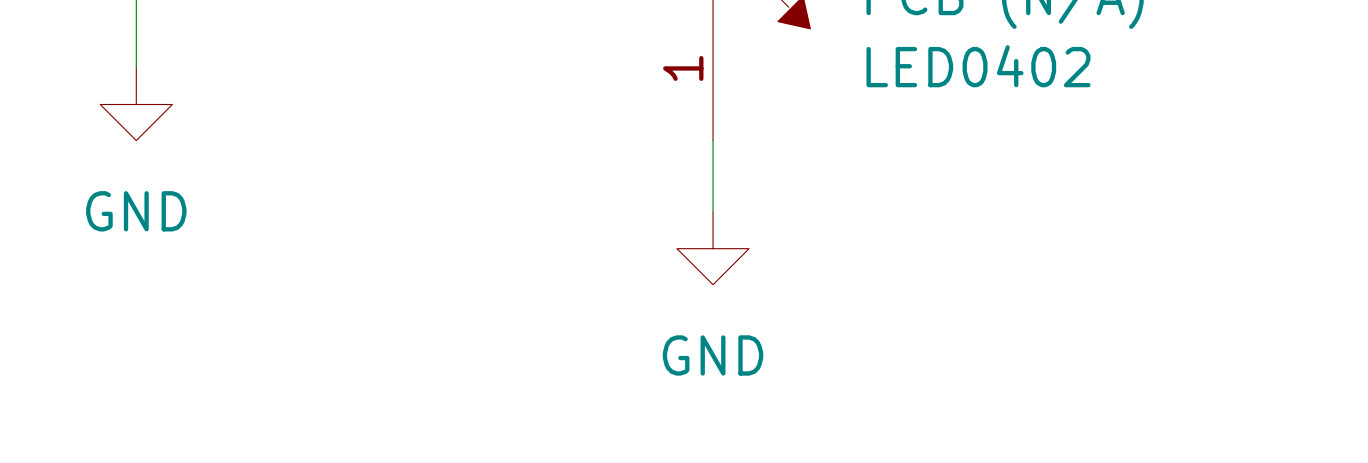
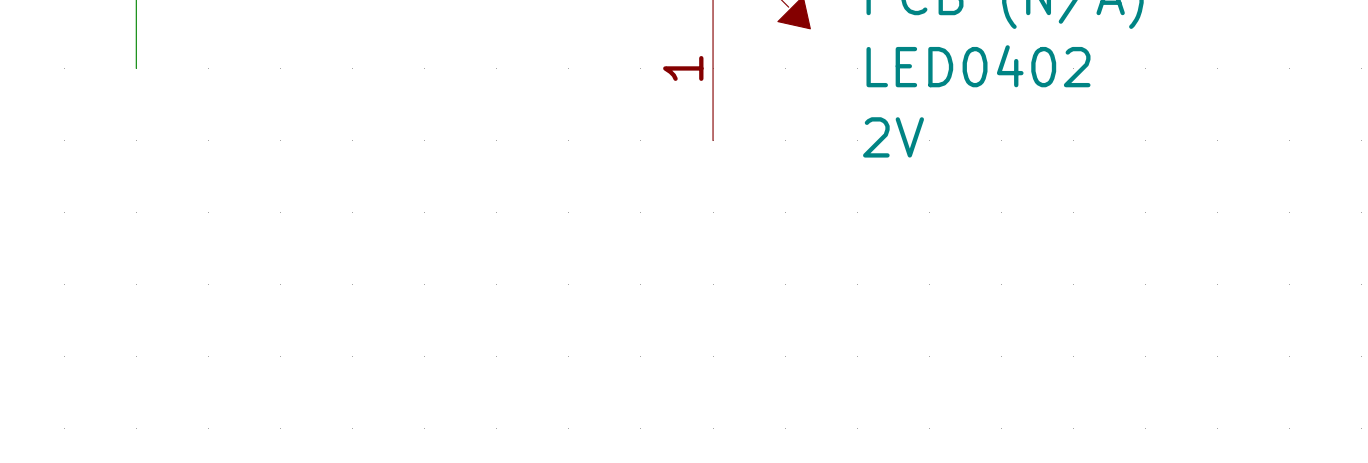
power symbol: GND (136, 104) -> none
part text: none -> 2V (893, 137)
wire: (713, 140) (713, 212) -> none
power symbol: GND (713, 248) -> none

